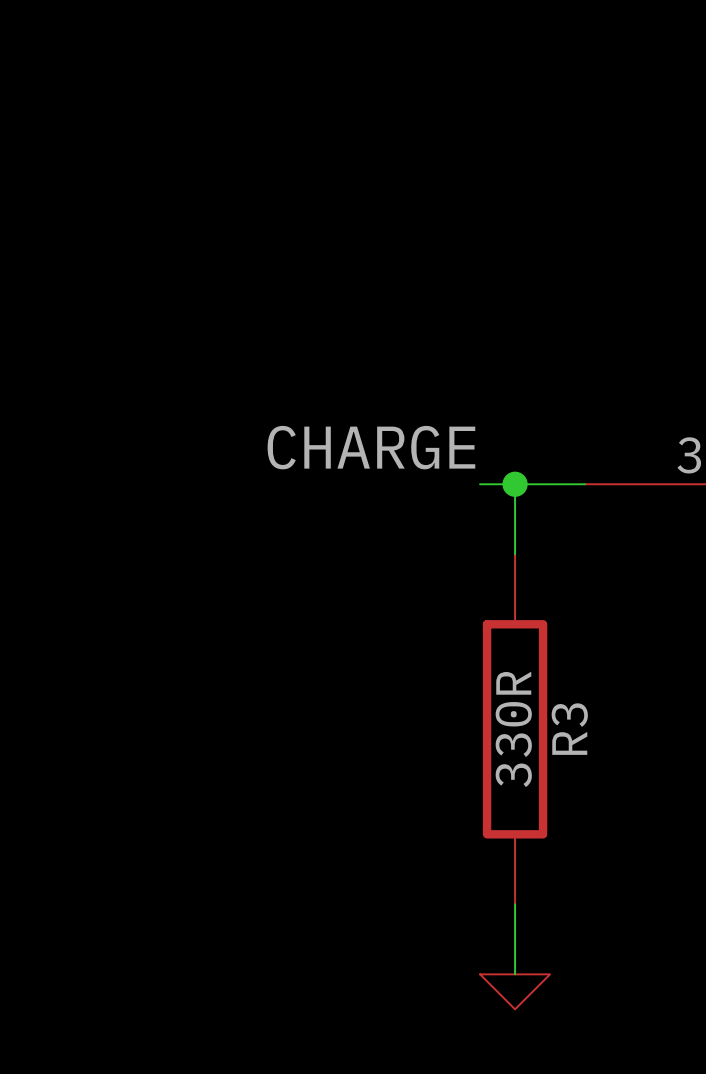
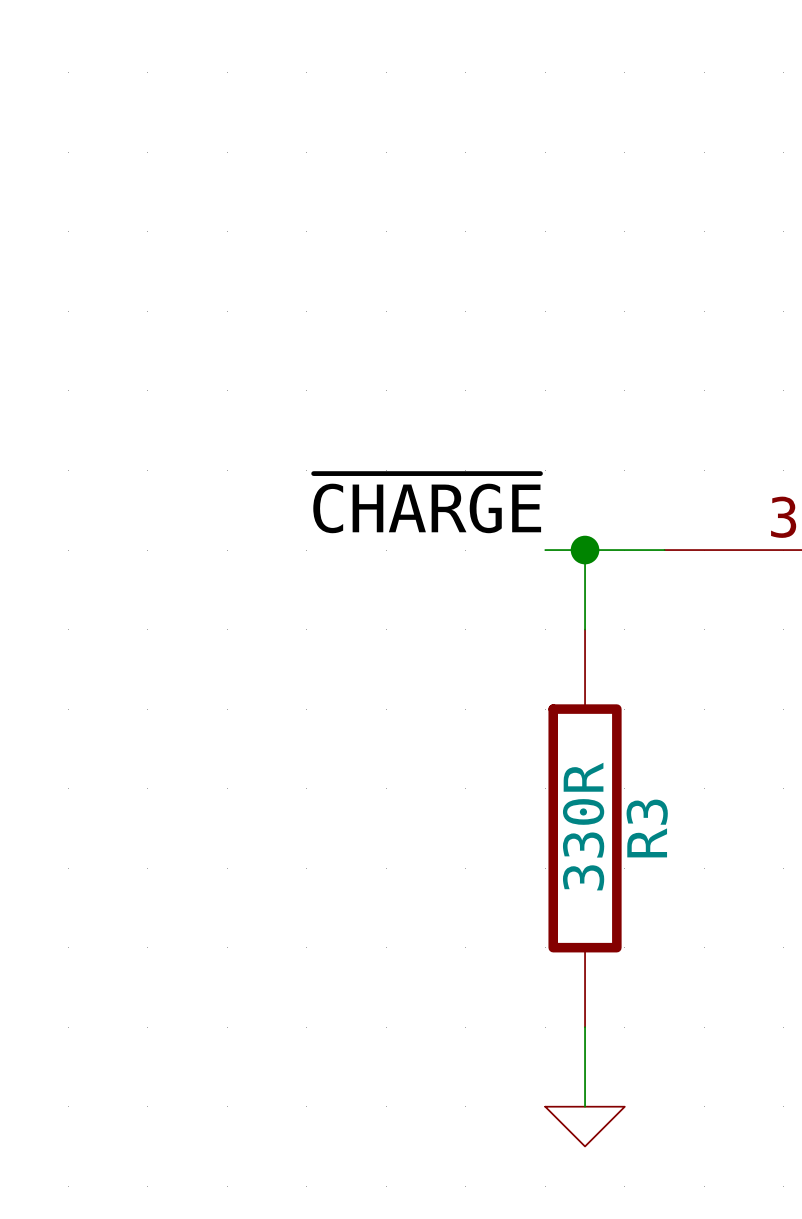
label: CHARGE (371, 447) -> ~{CHARGE} (427, 503)

